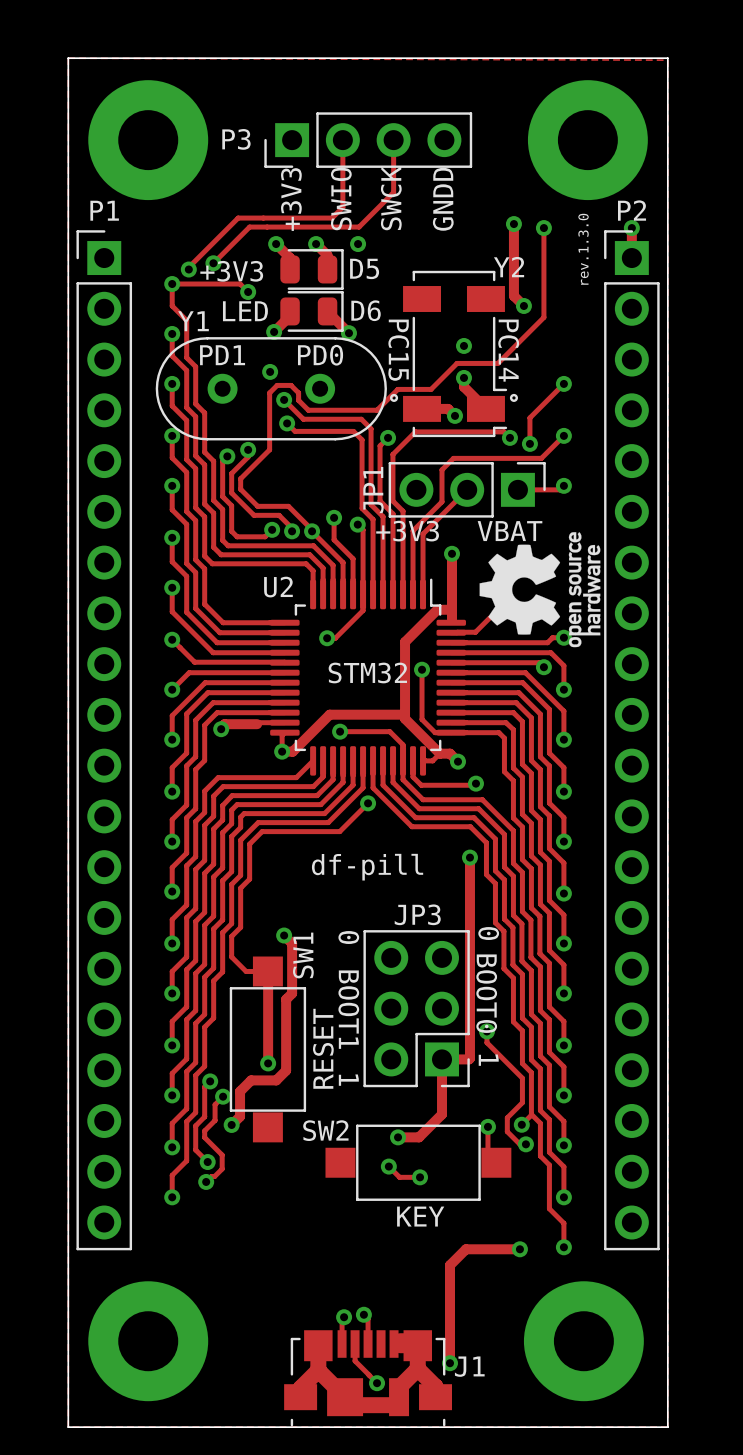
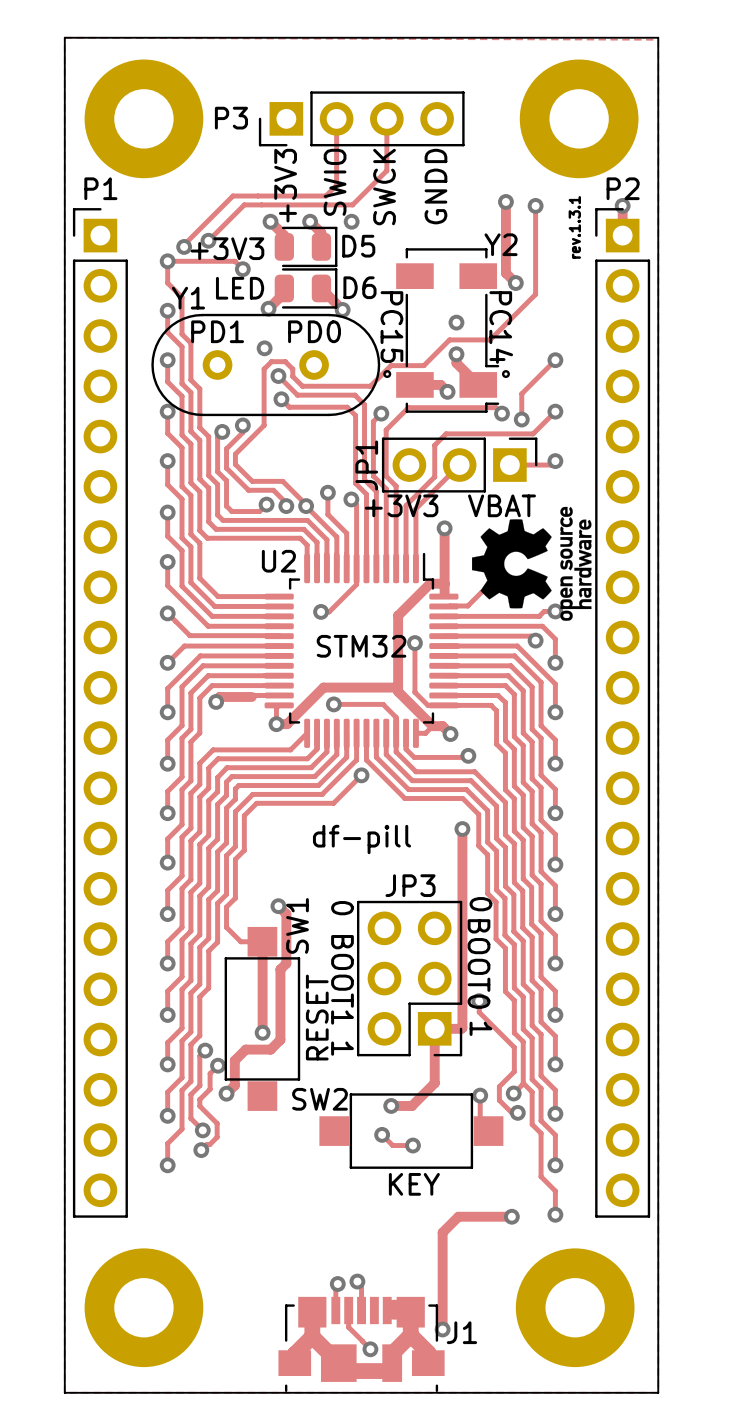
text: rev.1.3.0 (583, 249) -> rev.1.3.1 (574, 227)

